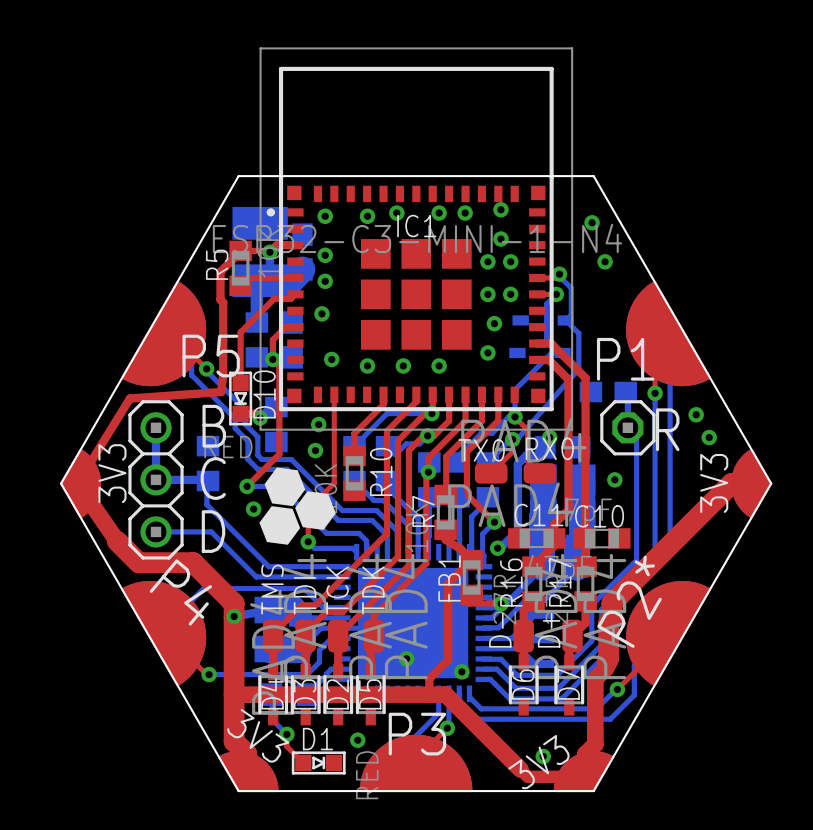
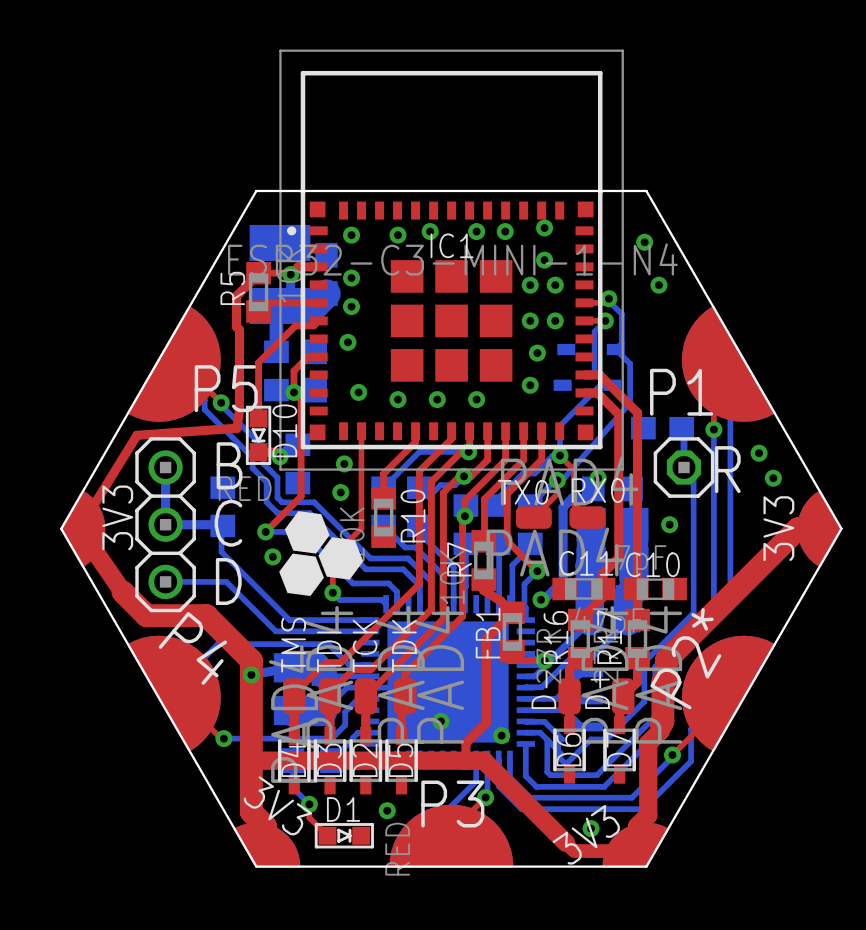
bottom track: (601, 644) (558, 688) (516, 688) -> (655, 706) (655, 716) (596, 775) (550, 775) (547, 772) (547, 739)
bottom track: (611, 649) (561, 698) (509, 698) (490, 679) (483, 679) -> (666, 710) (666, 724) (604, 786) (536, 786) (525, 776) (525, 743)
bottom track: (517, 675) (543, 675) -> (558, 735) (558, 756) (566, 764) (590, 739)
bottom track: (617, 689) (596, 708) (481, 708) (469, 697) -> (672, 754) (673, 756) (631, 797) (530, 797) (509, 777) (509, 763)
bottom track: (459, 705) (473, 719) (610, 719) -> (499, 772) (499, 786) (521, 809) (643, 809) (664, 787)

